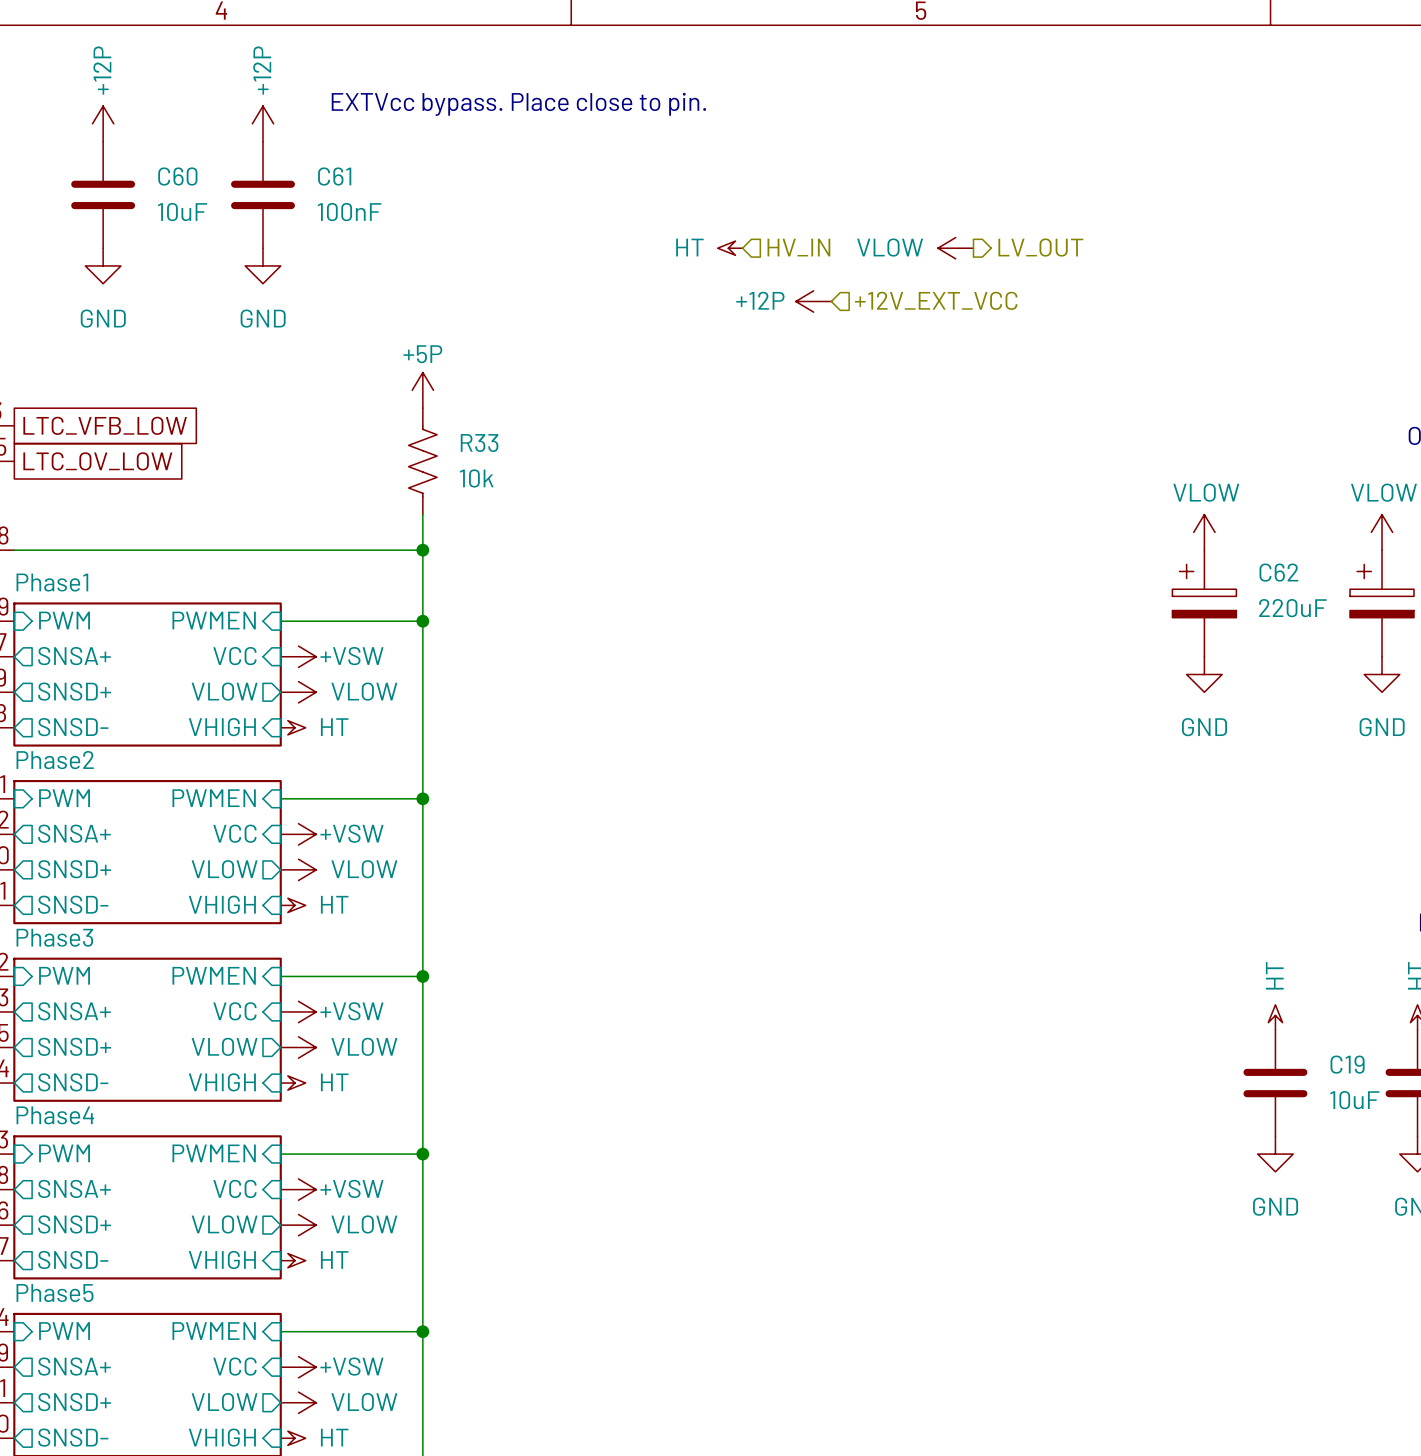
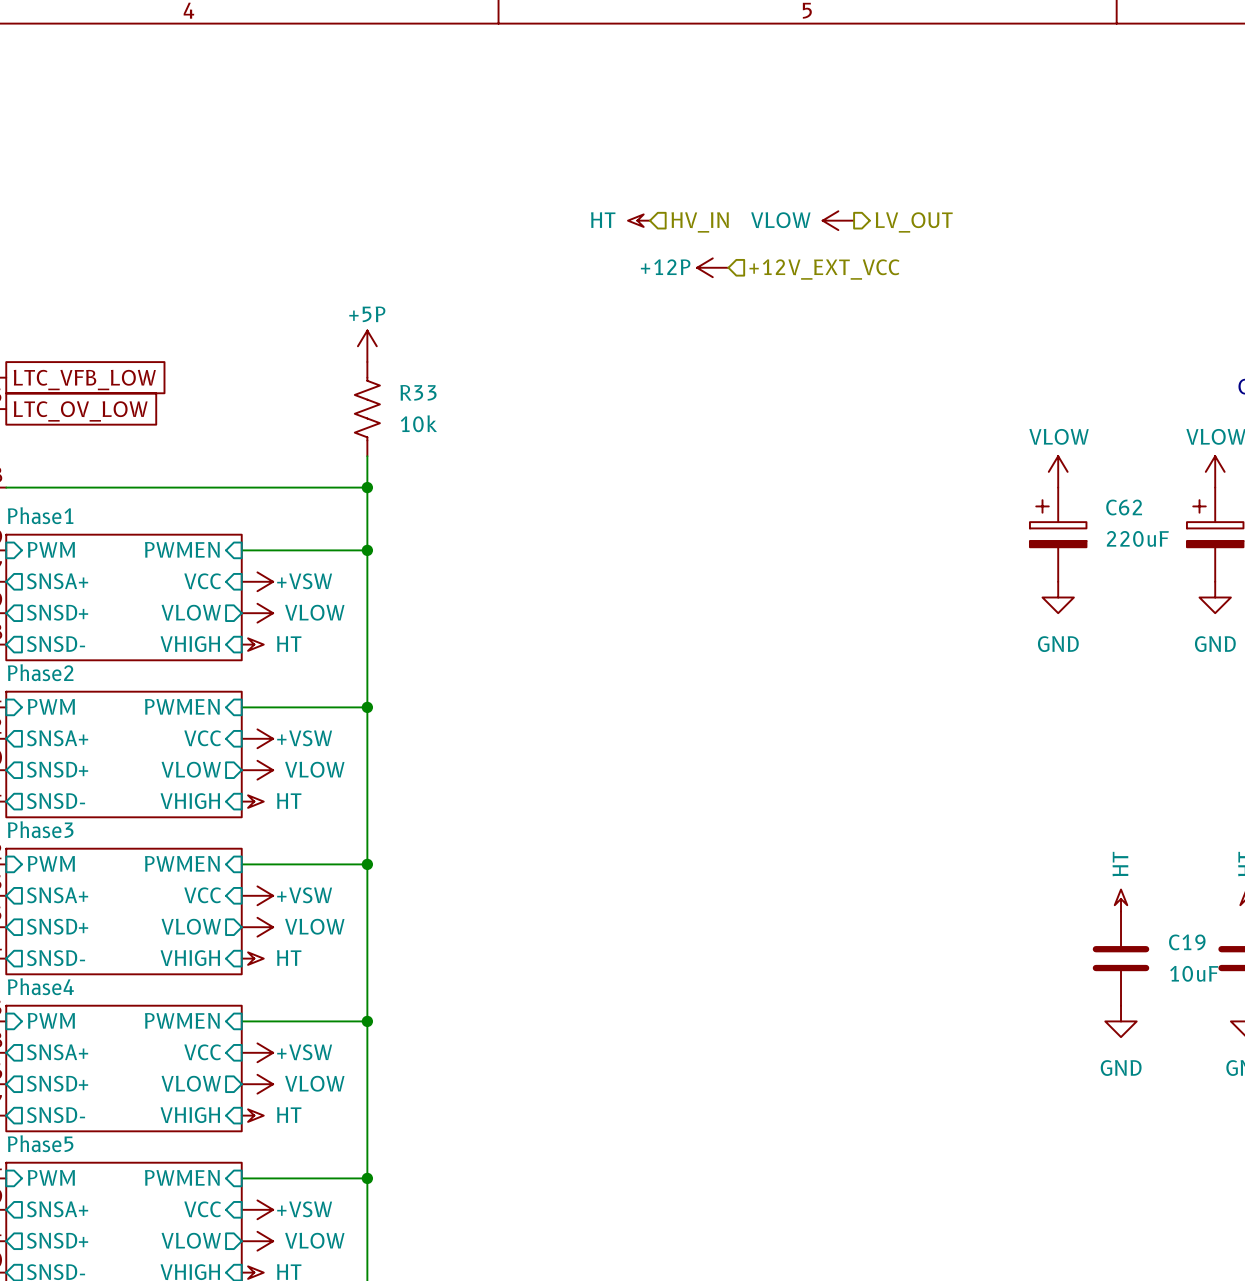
text: EXTVcc bypass. Place close to pin. (518, 104) -> none
power symbol: +12P (103, 123) -> none
power symbol: +12P (262, 123) -> none
C60: 10uF (103, 194) -> none
C61: 100nF (262, 194) -> none
power symbol: GND (103, 265) -> none
power symbol: GND (262, 265) -> none

